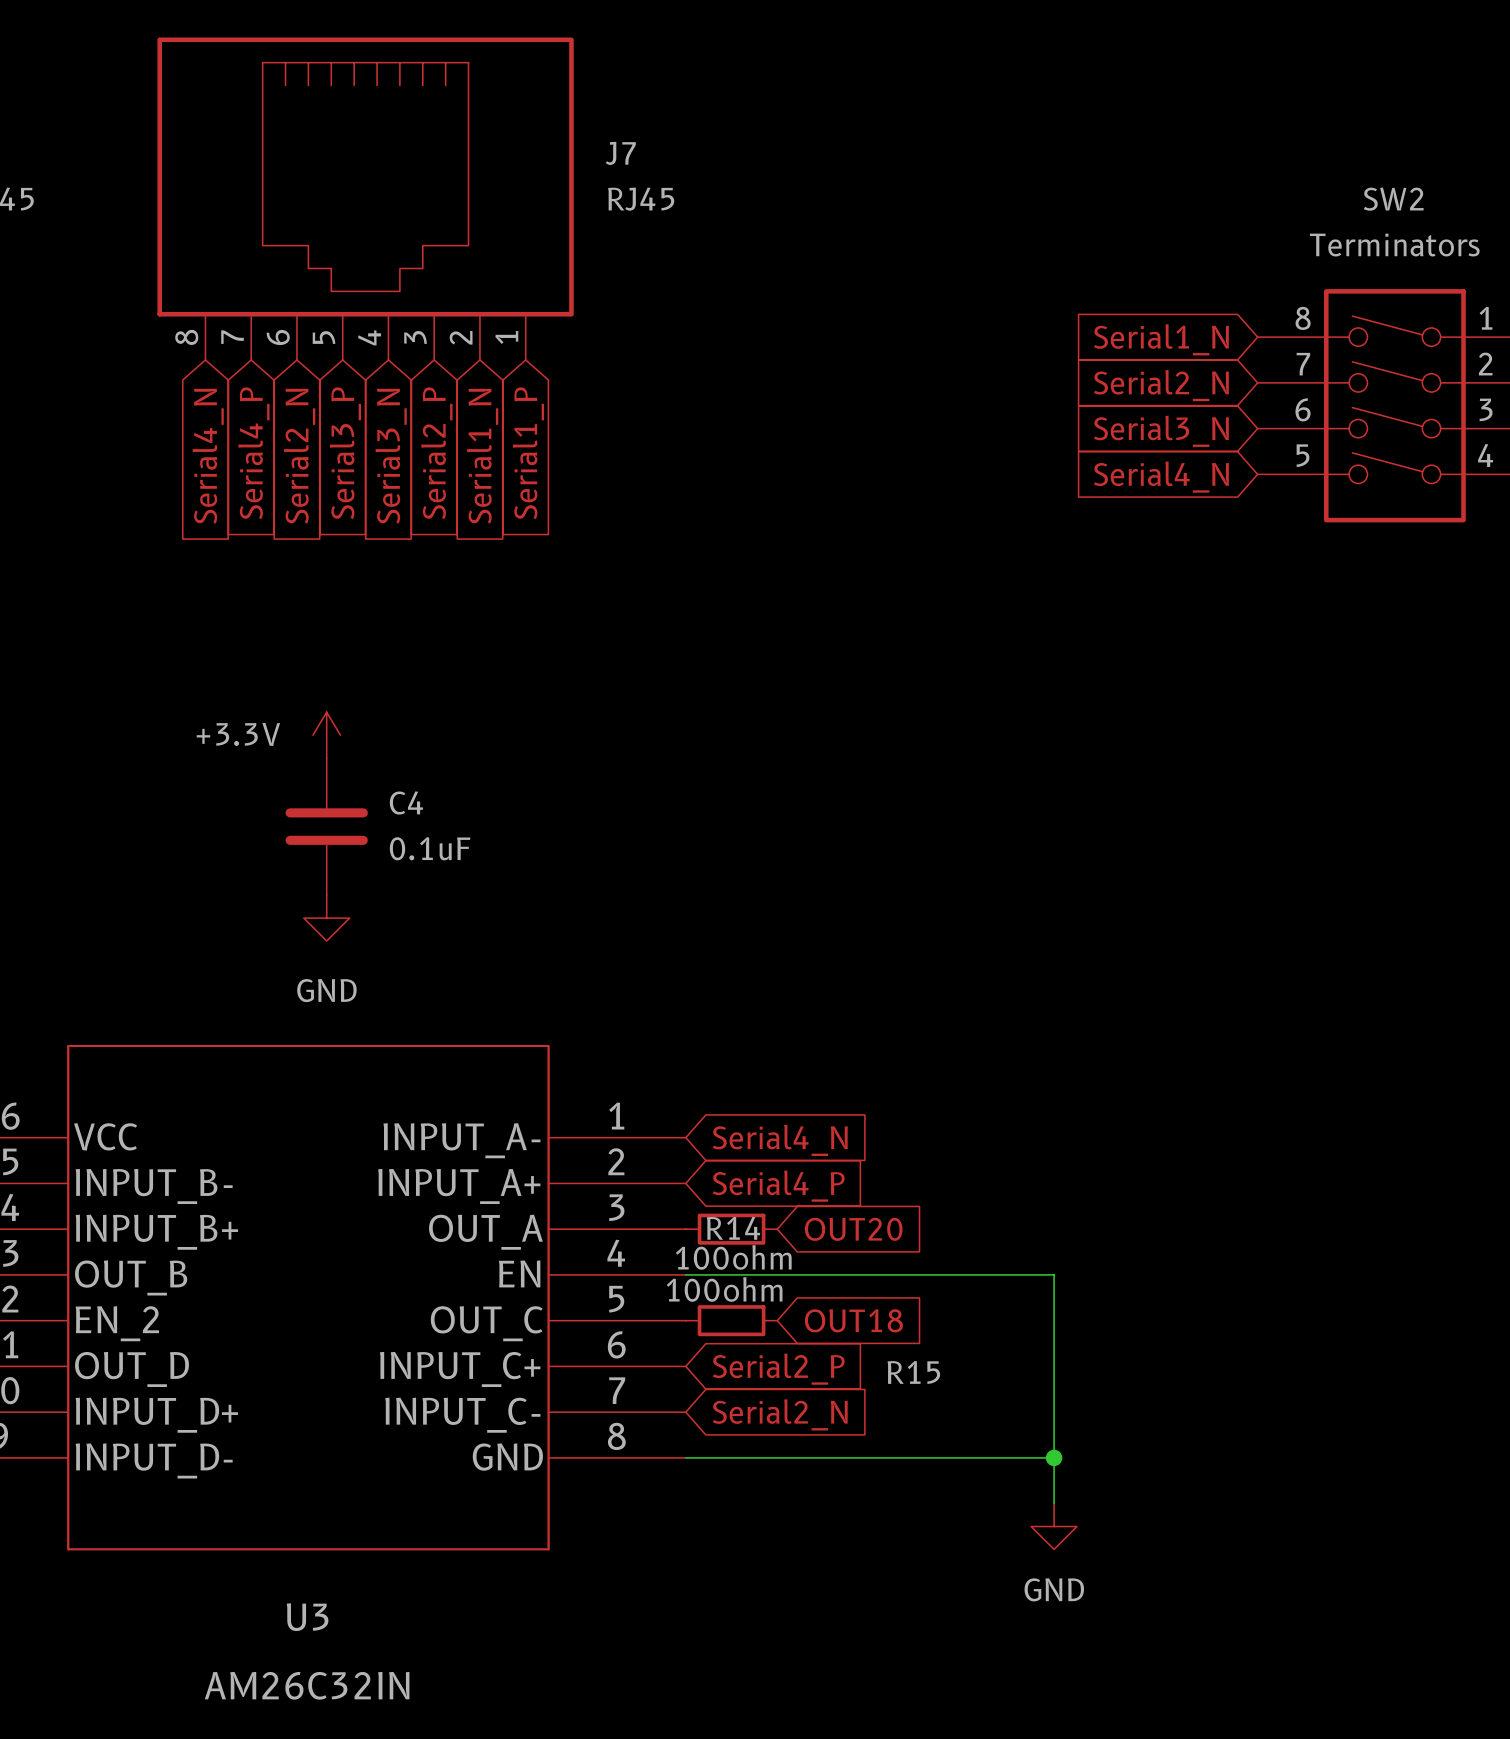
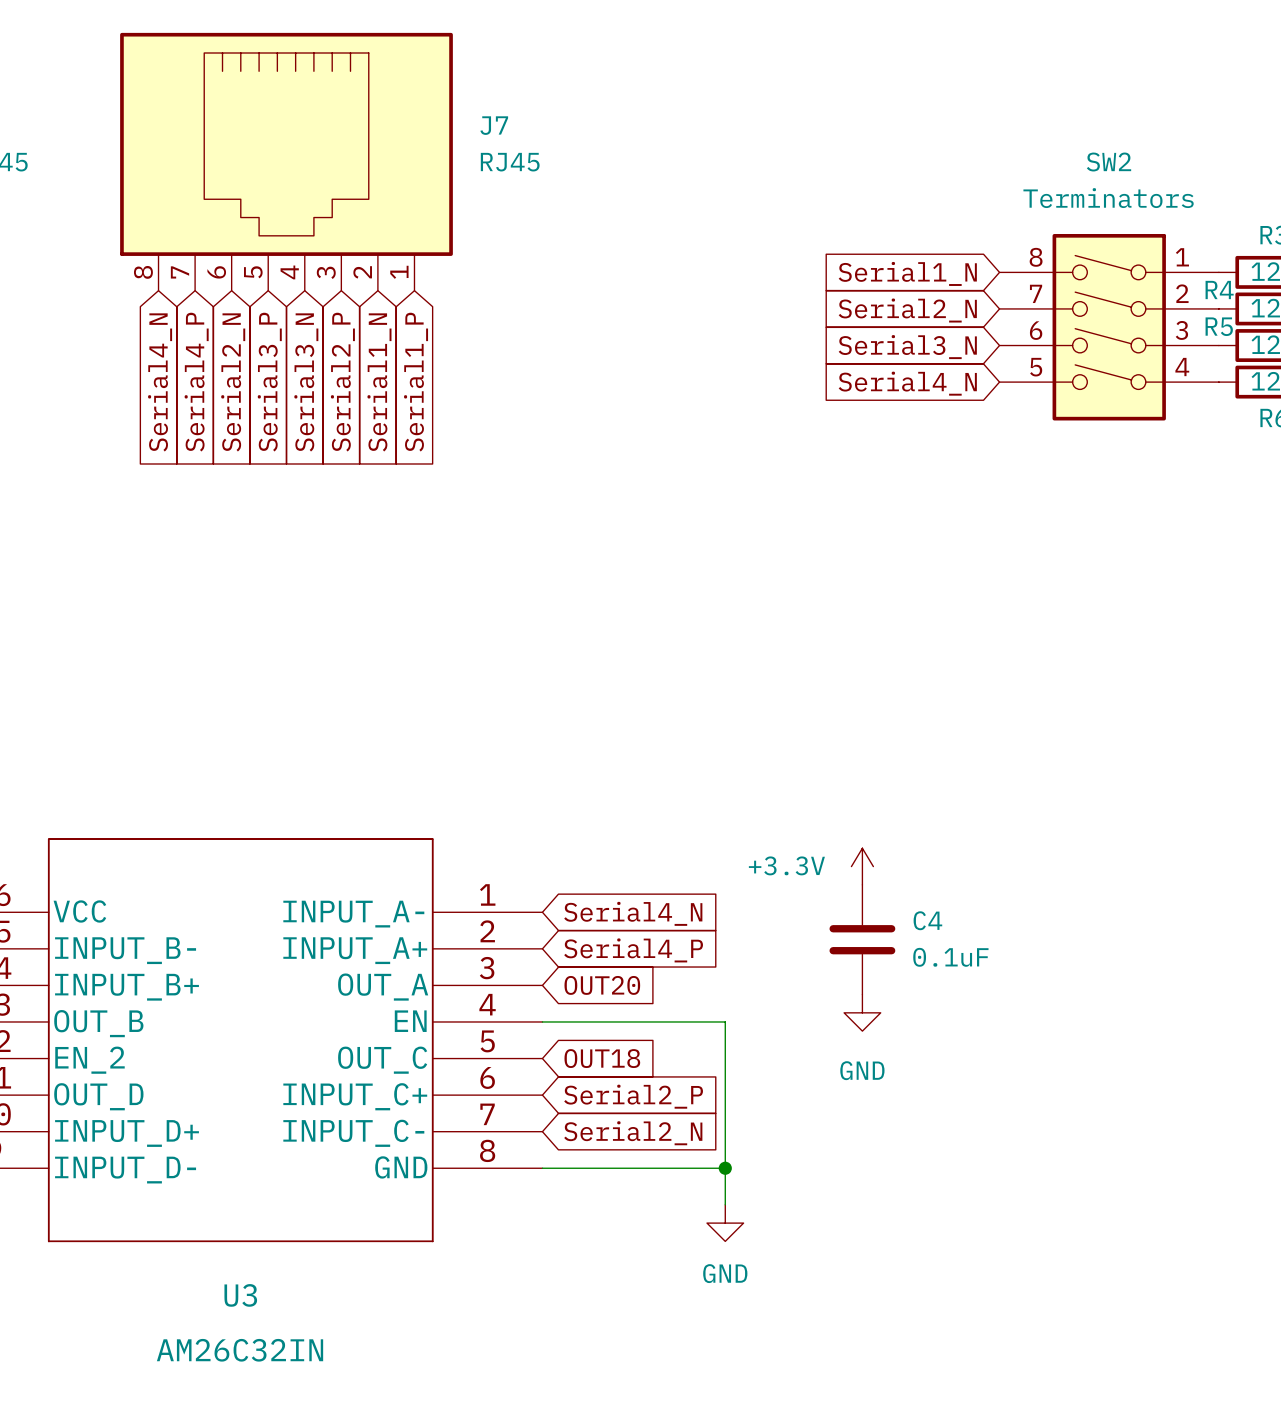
power symbol: +3.3V (326, 735) -> none
C4 position: (326, 826) -> (862, 939)
power symbol: GND (326, 918) -> none
power symbol: none -> +3.3V (862, 866)
R14: 100ohm (731, 1229) -> none
global label position: OUT20 (853, 1229) -> OUT20 (602, 985)
power symbol: none -> GND (862, 1012)
wire: (914, 1274) (1054, 1274) (1054, 1503) -> (725, 1021) (725, 1204)
R15: 100ohm (731, 1320) -> none
global label position: OUT18 (853, 1320) -> OUT18 (602, 1058)
wire: (914, 1457) (1054, 1457) -> none
junction: none -> (725, 1168)
junction: (1054, 1457) -> none
power symbol: none -> GND (725, 1223)
power symbol: GND (1054, 1526) -> none

